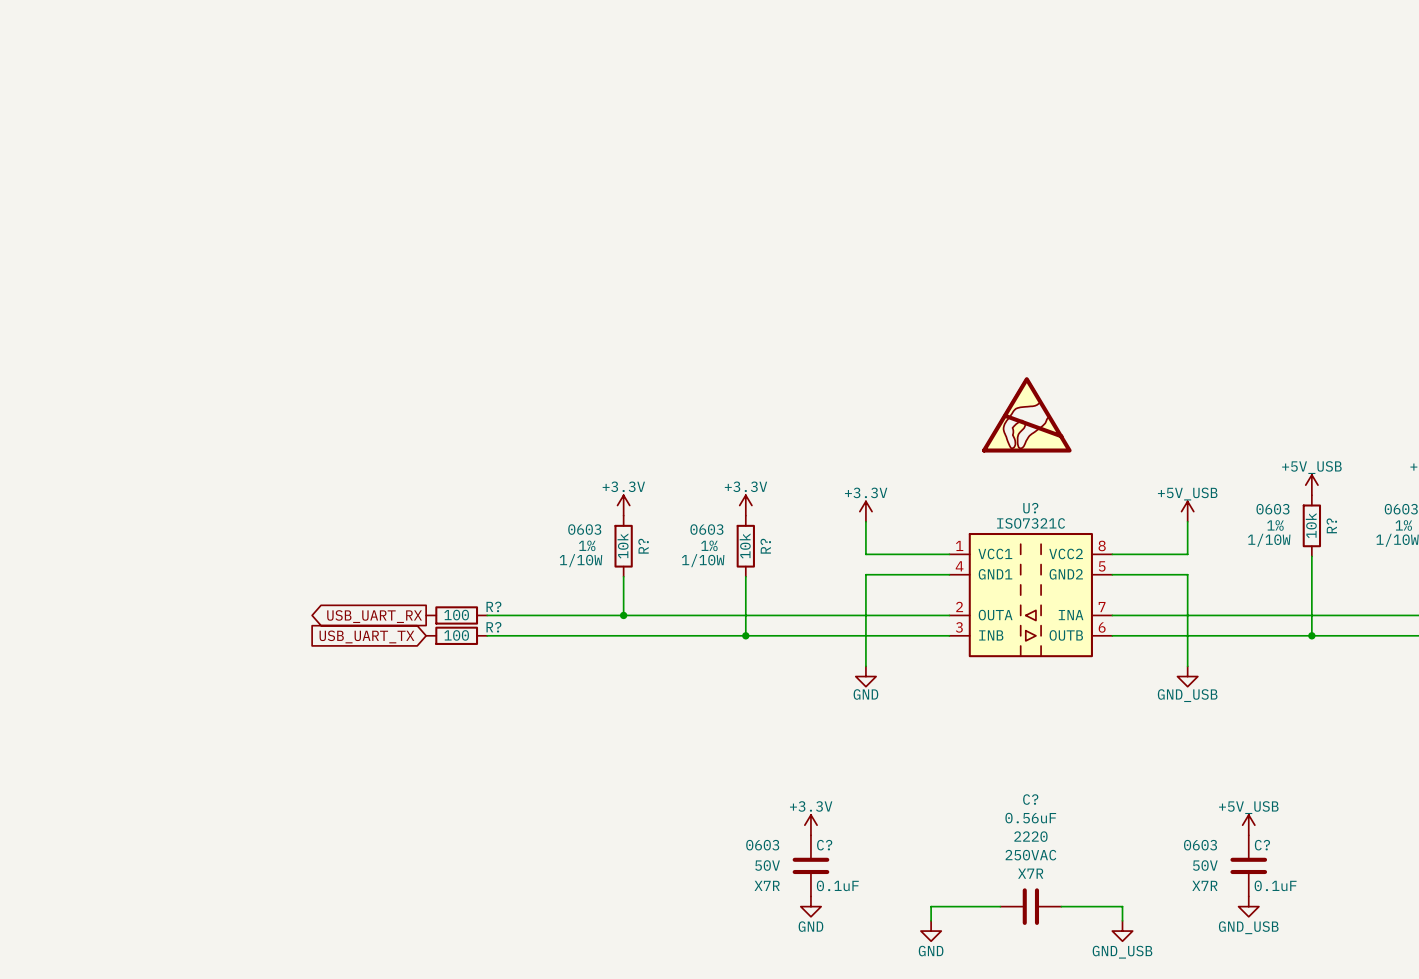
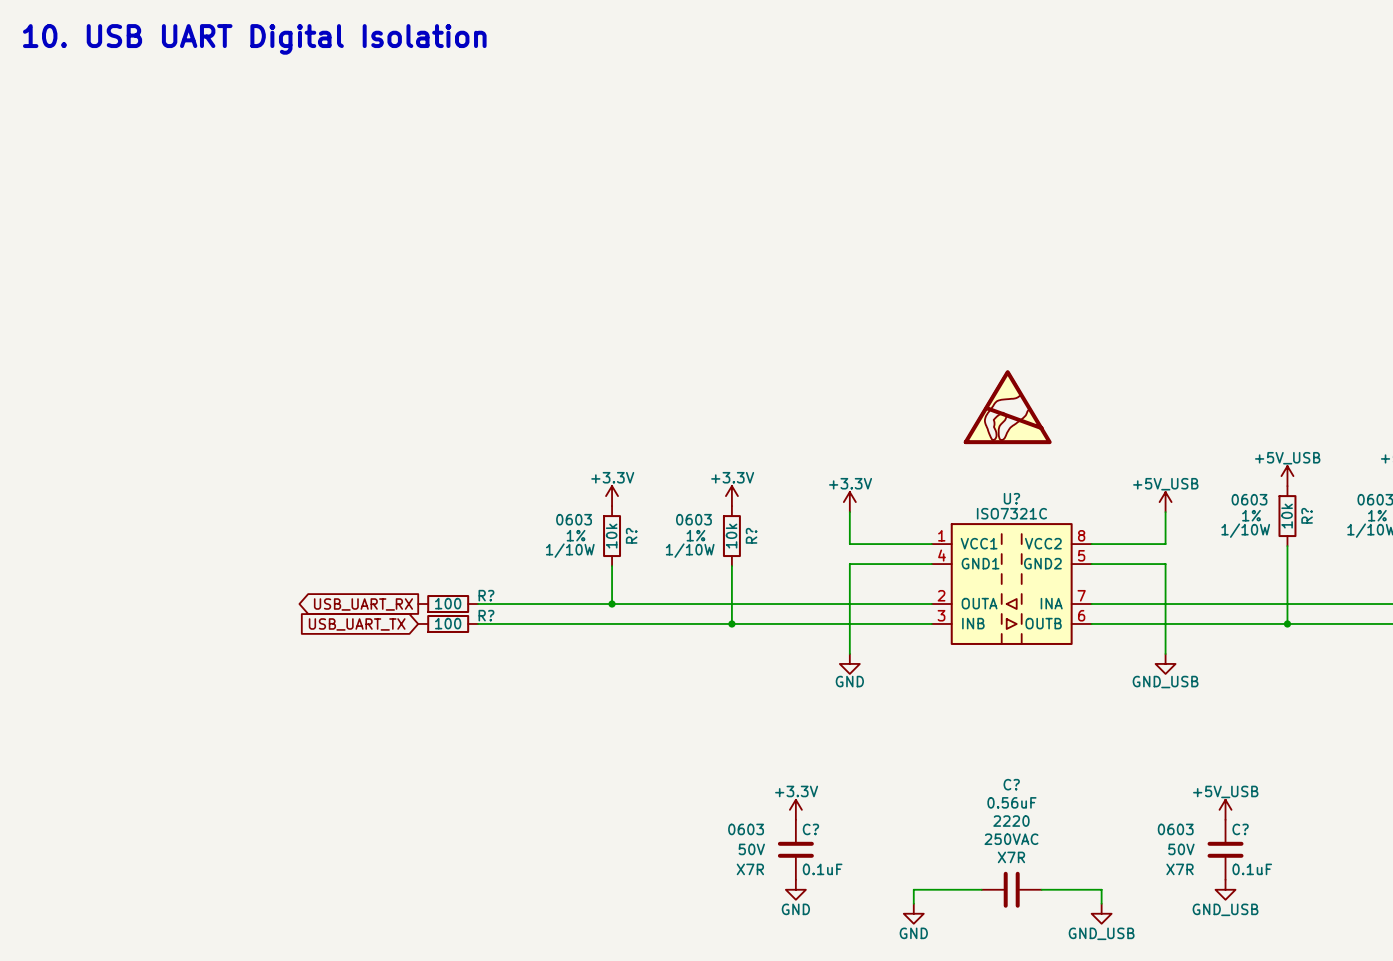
text: none -> 10. USB UART Digital Isolation (254, 39)

